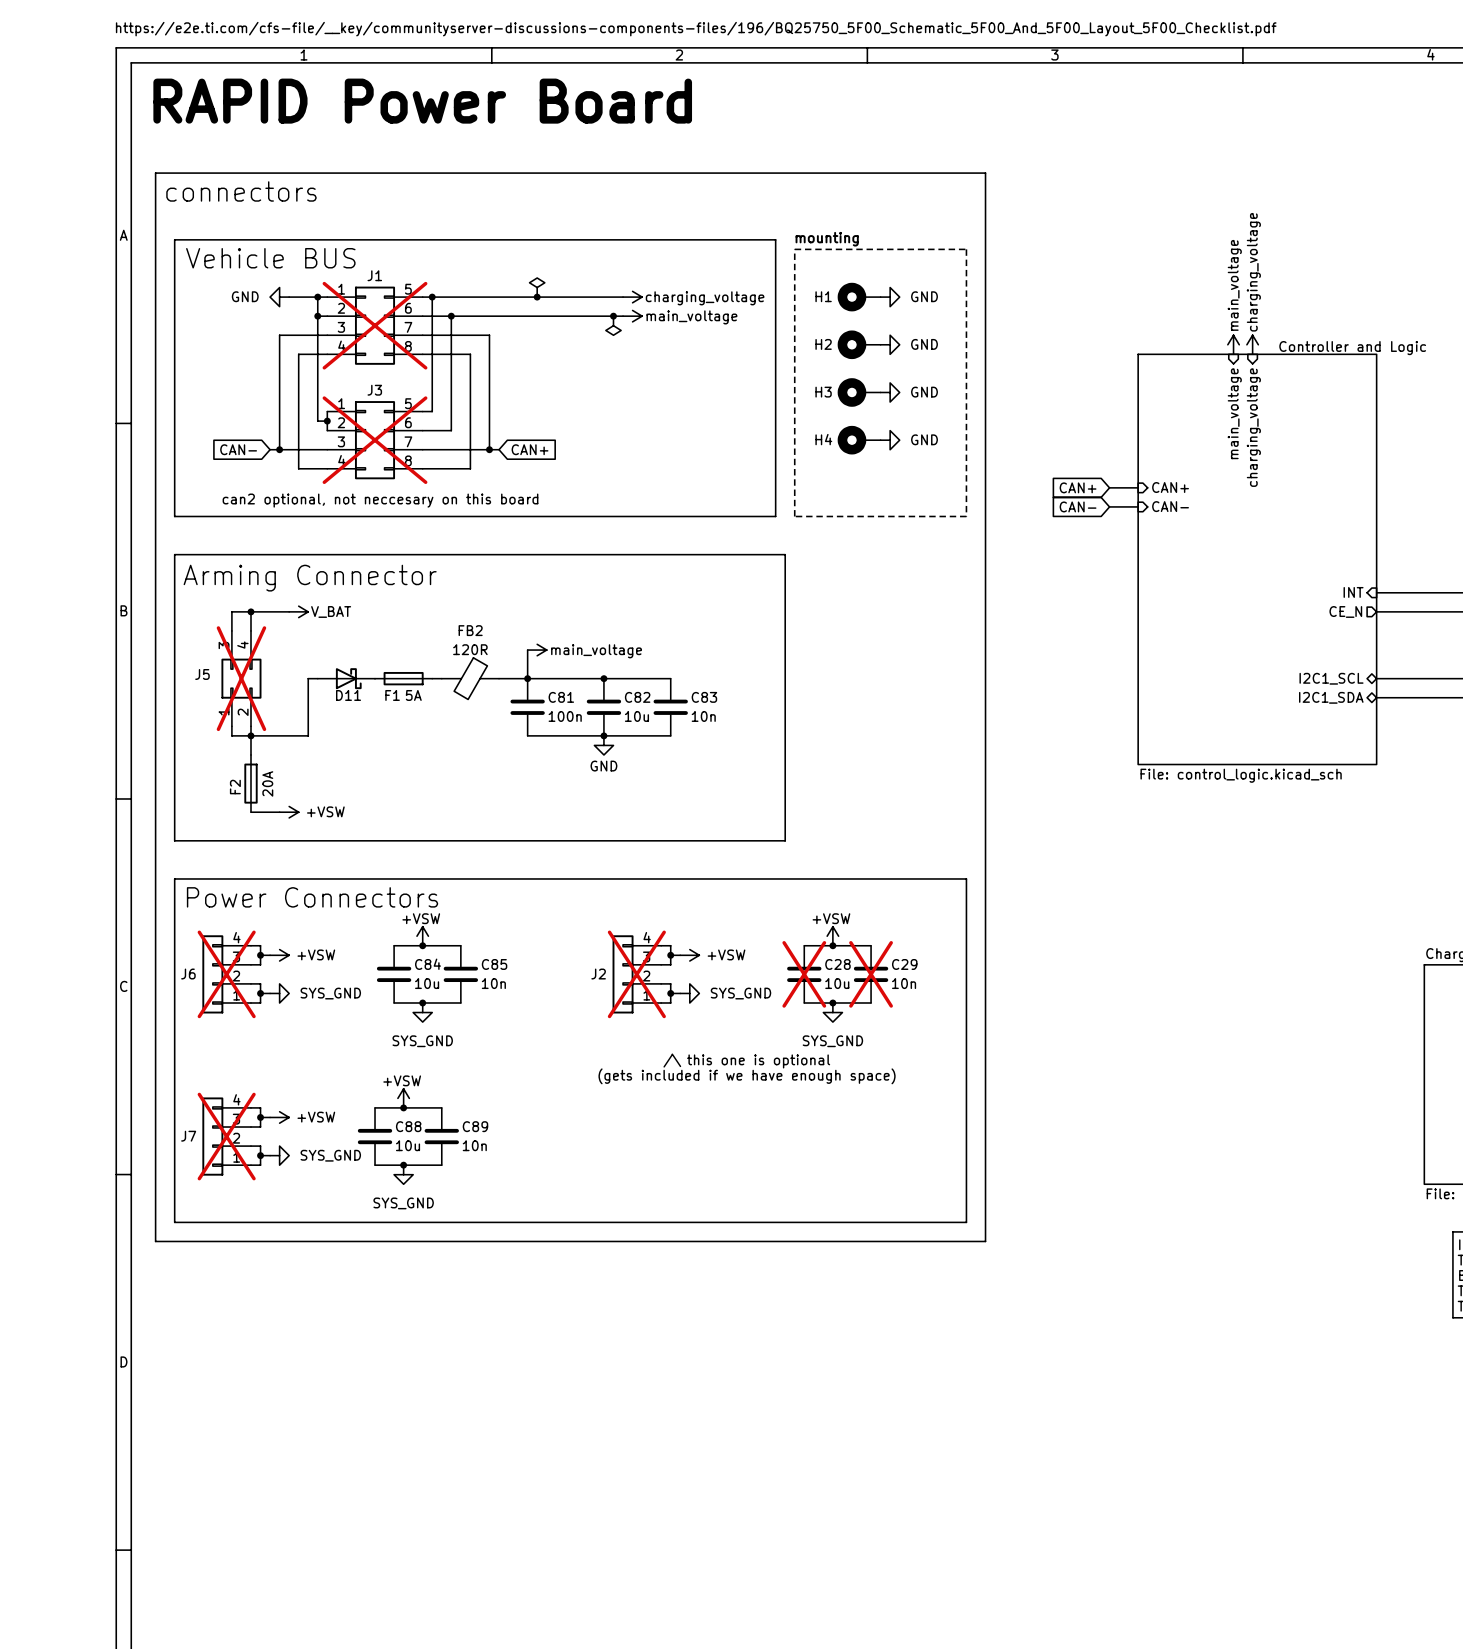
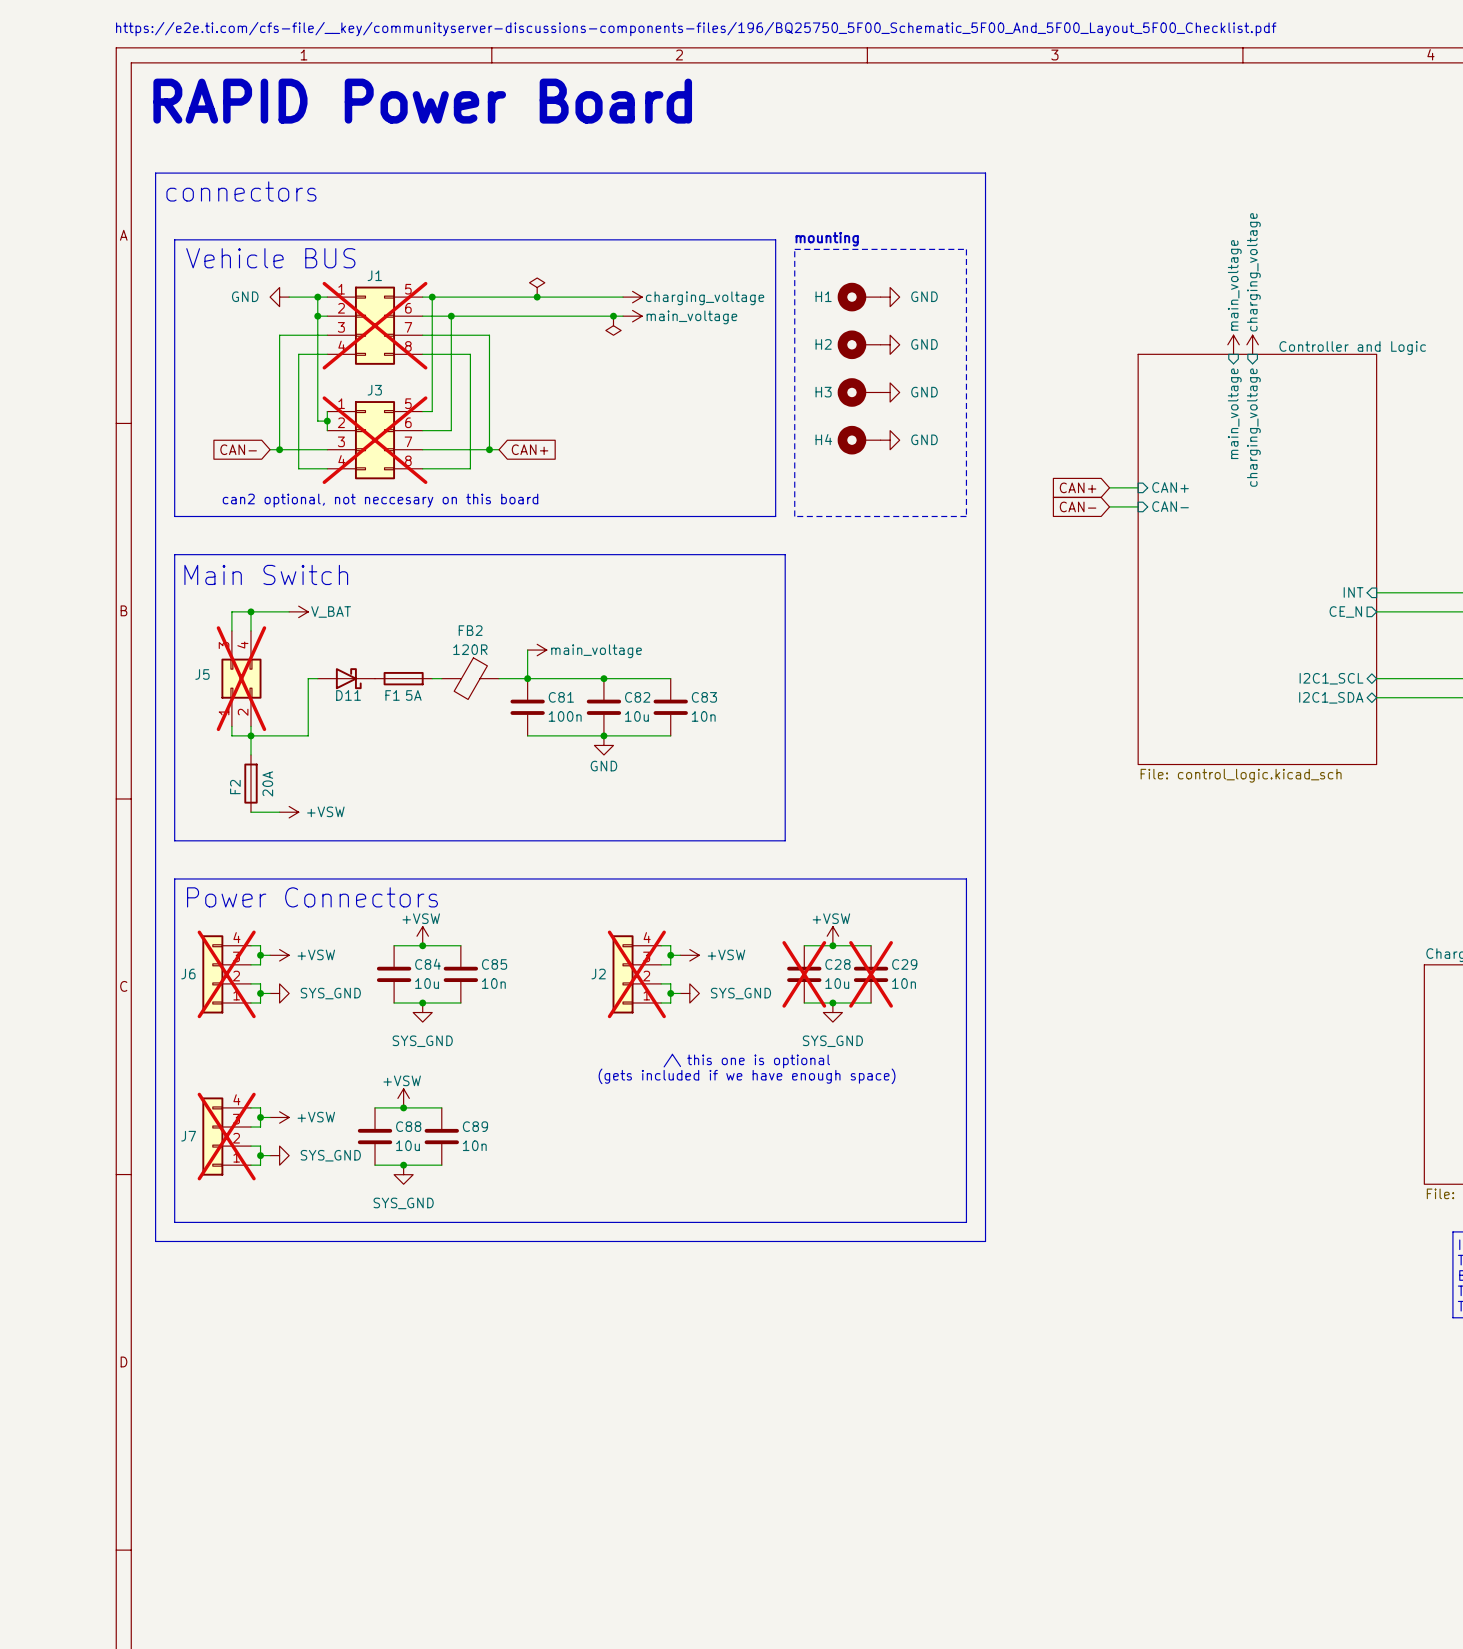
text: none -> Main Switch (266, 574)
text: Arming Connector (310, 578) -> none

